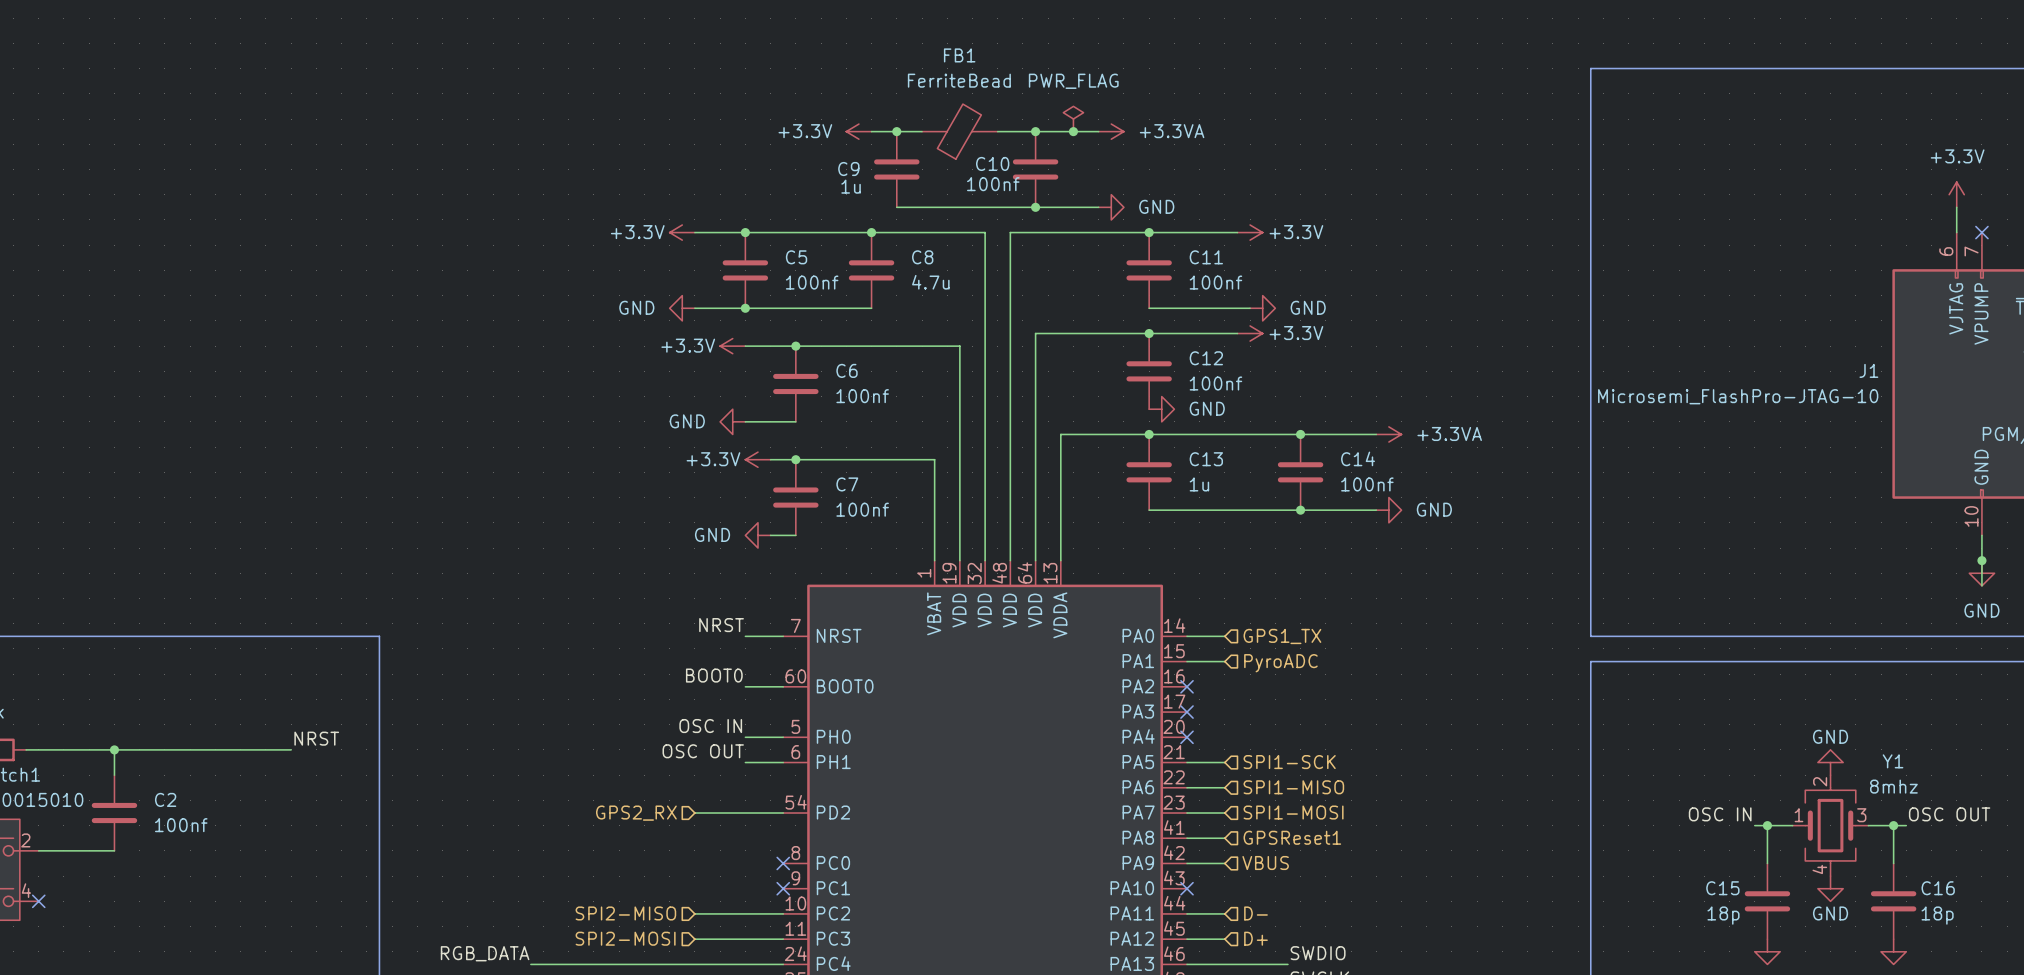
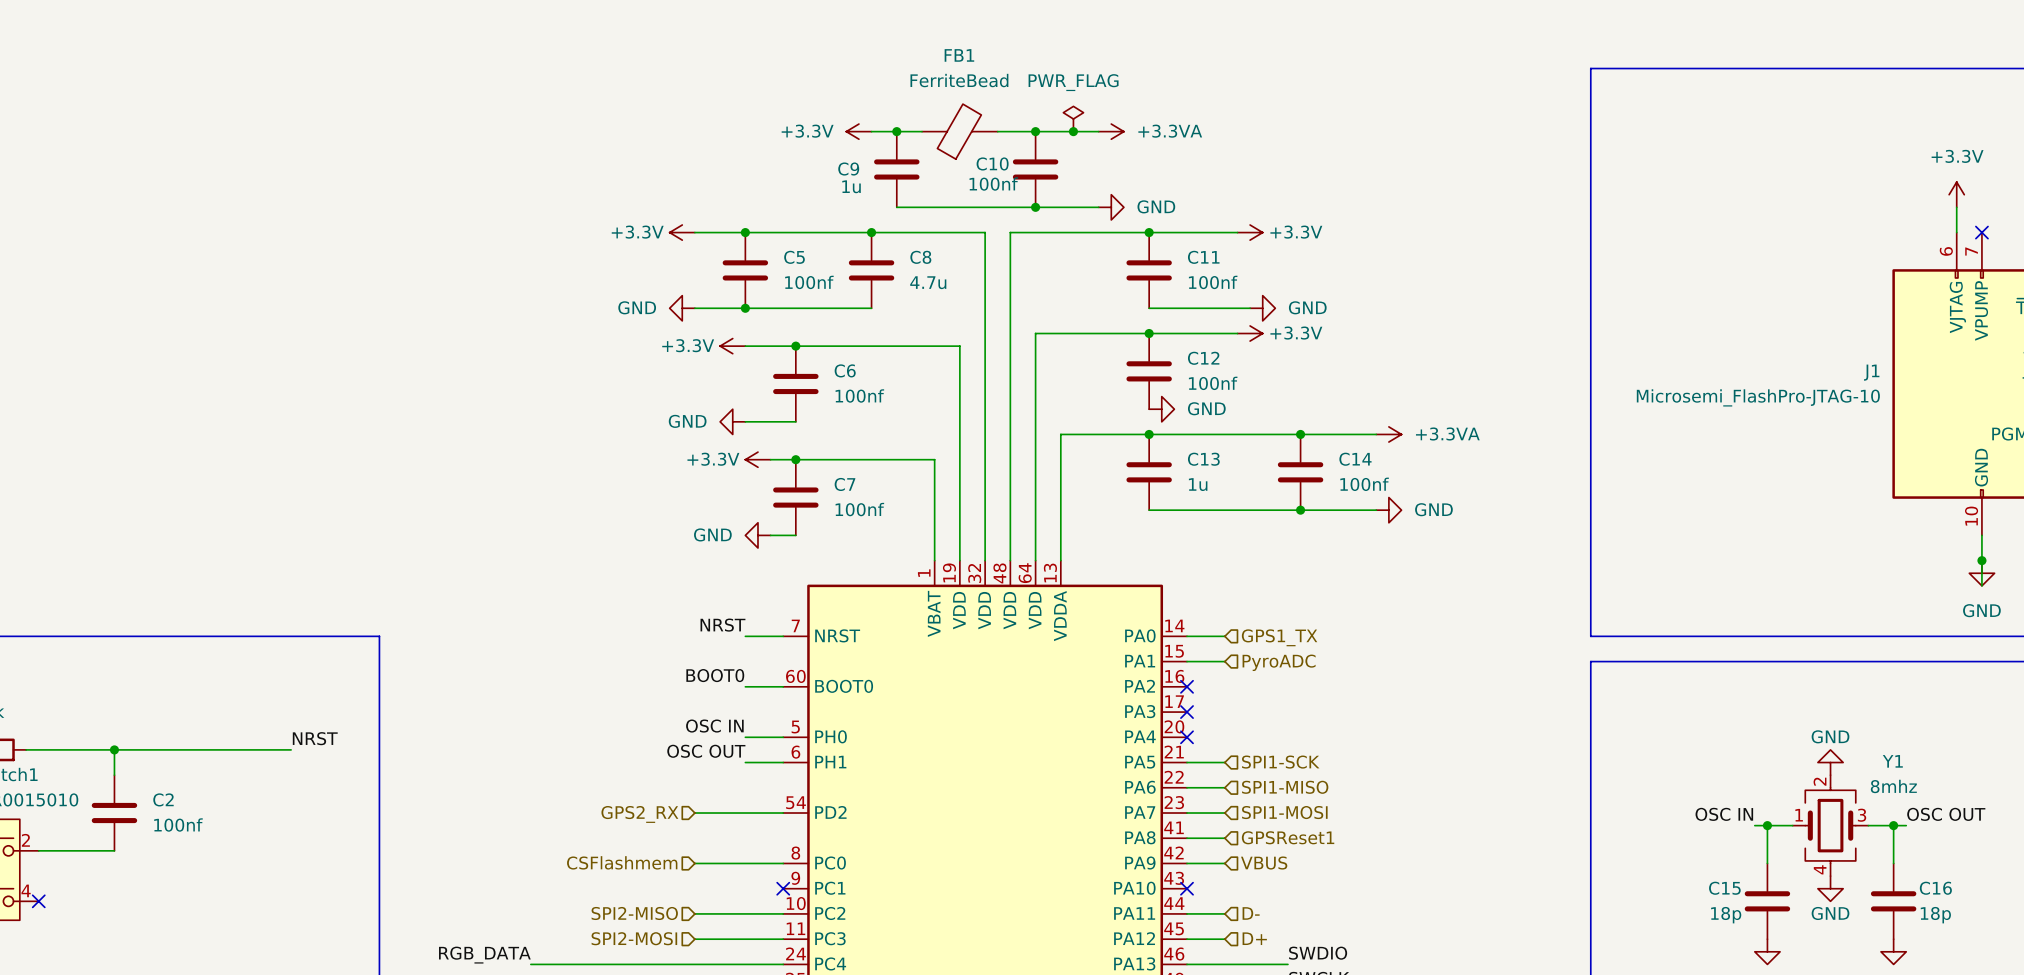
hierarchical label: none -> CSFlashmem (622, 862)
wire: none -> (694, 863) (783, 863)
no-connect mark: (783, 863) -> none

